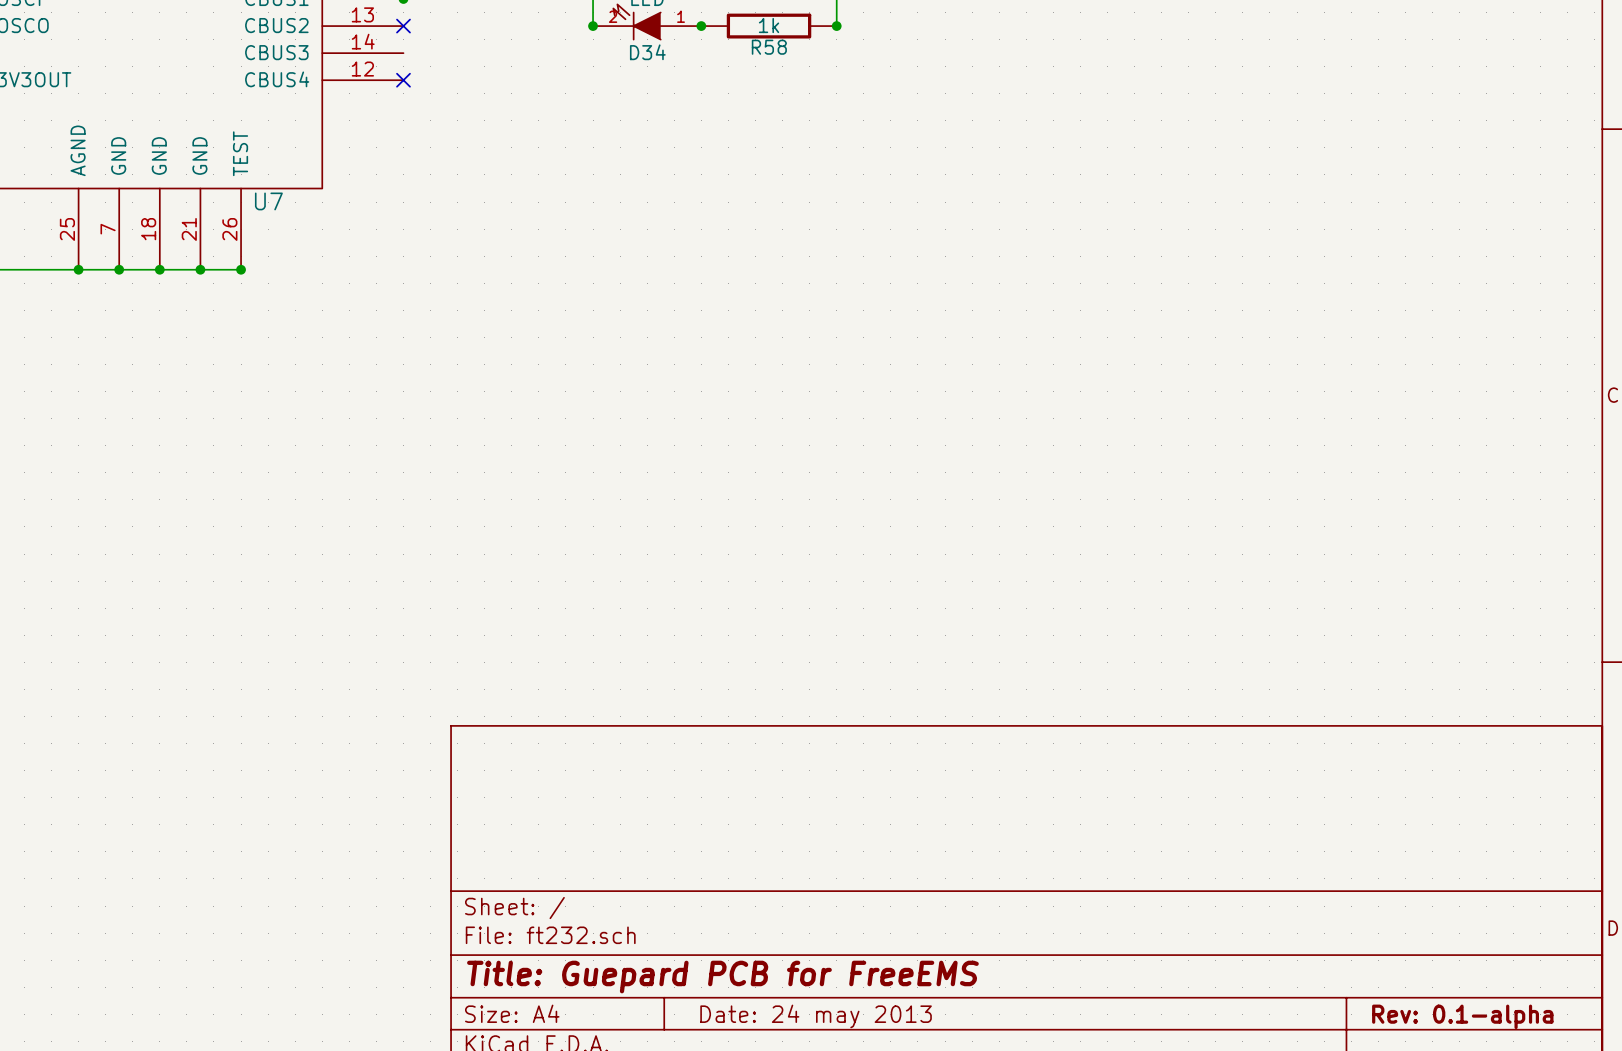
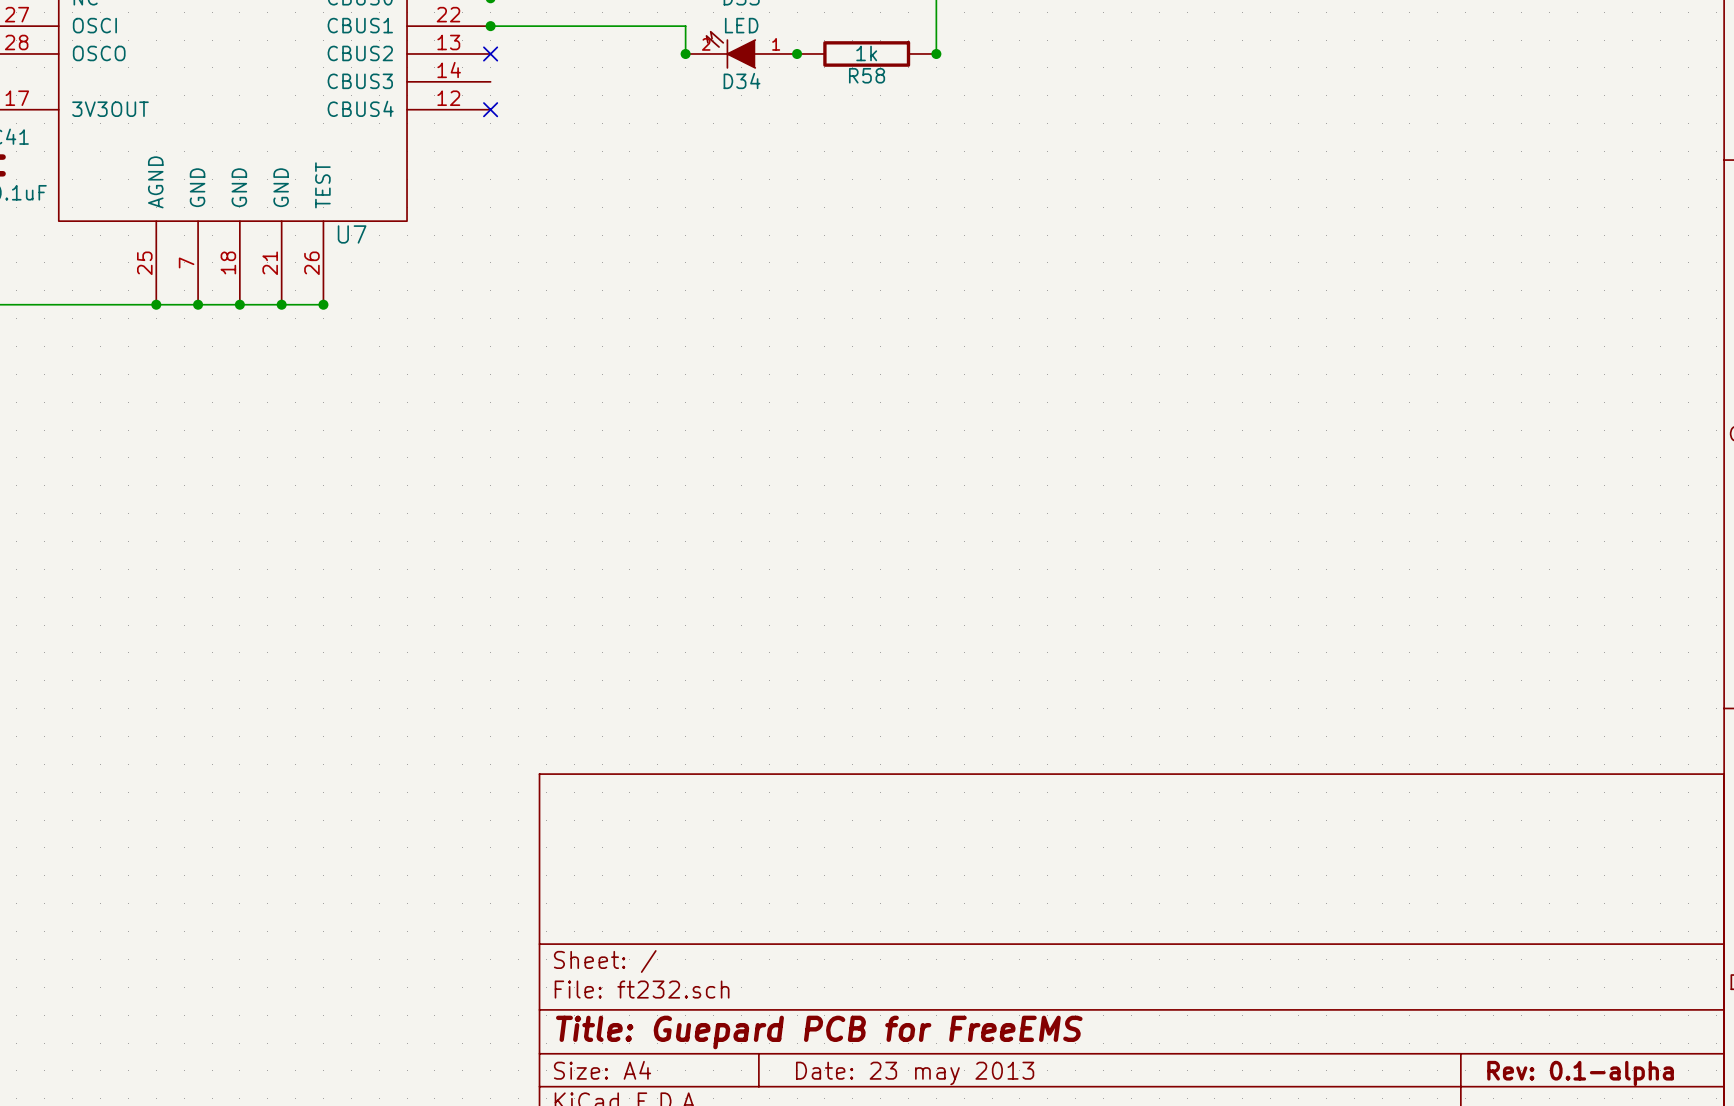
title block: Date: 24 may 2013 (816, 1016) -> Date: 23 may 2013 (915, 1073)

